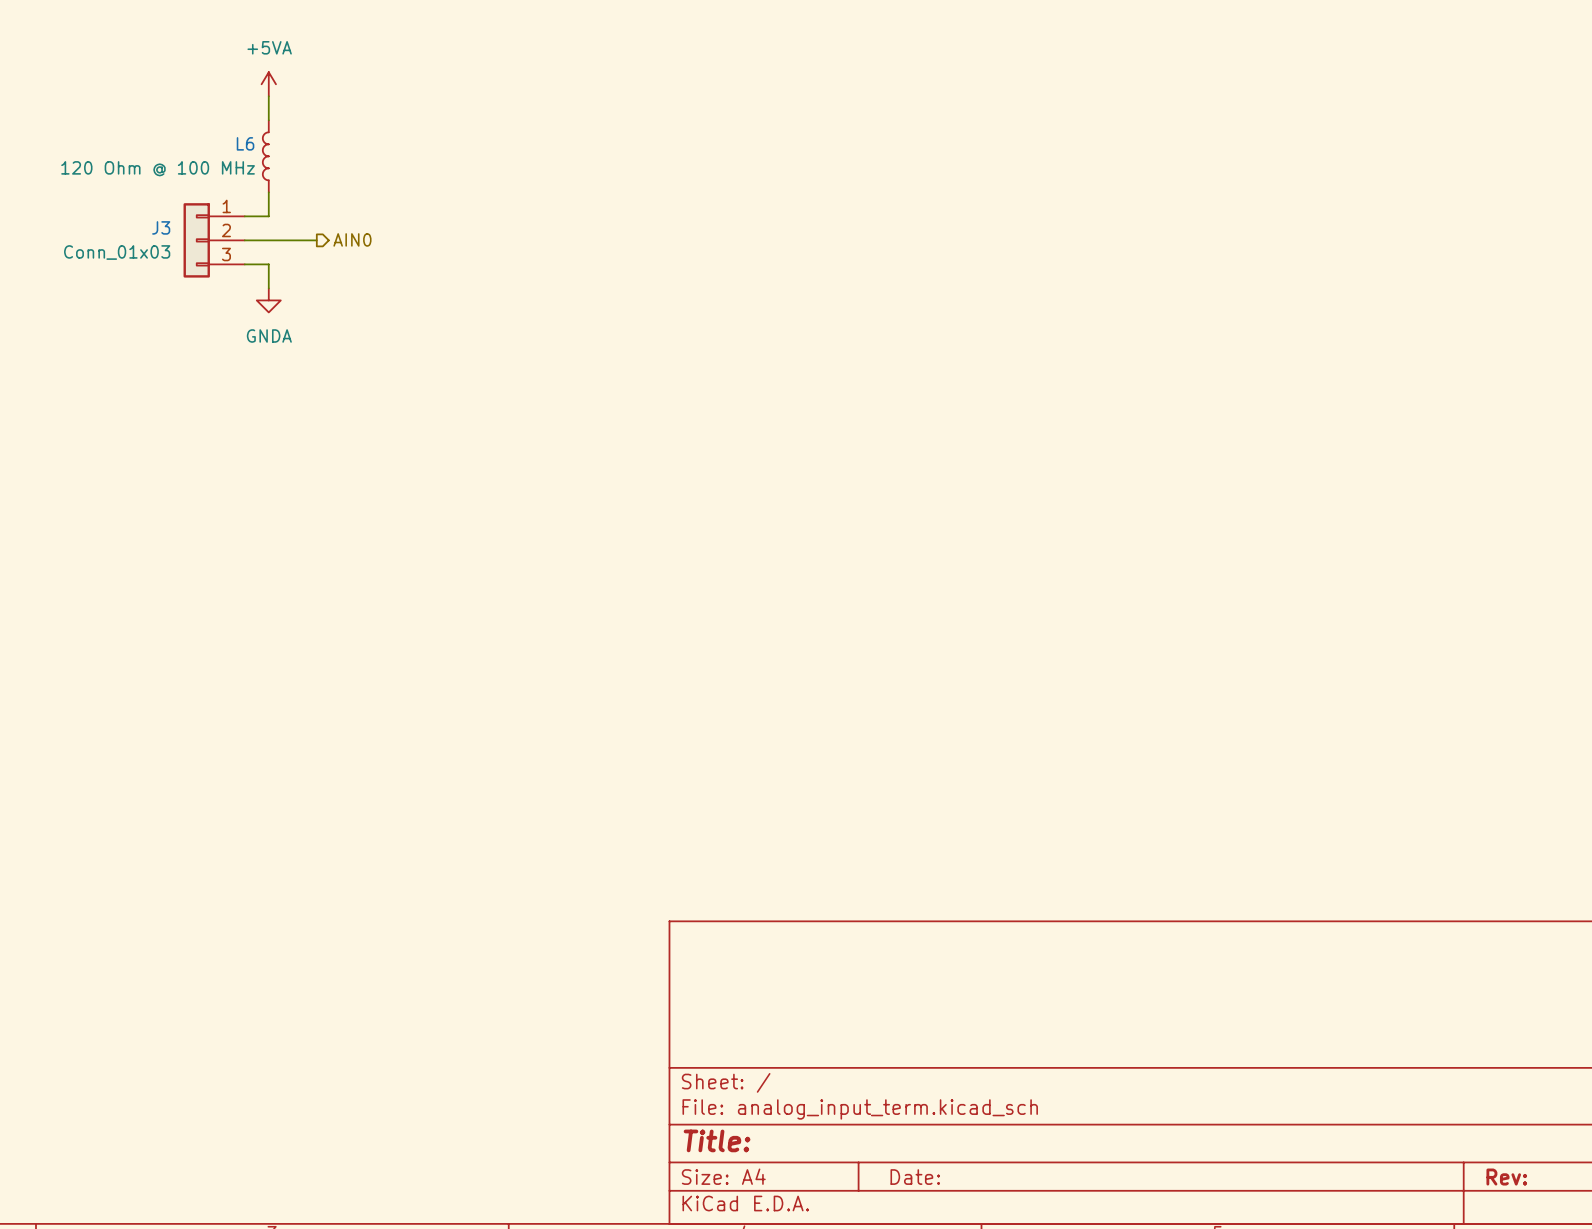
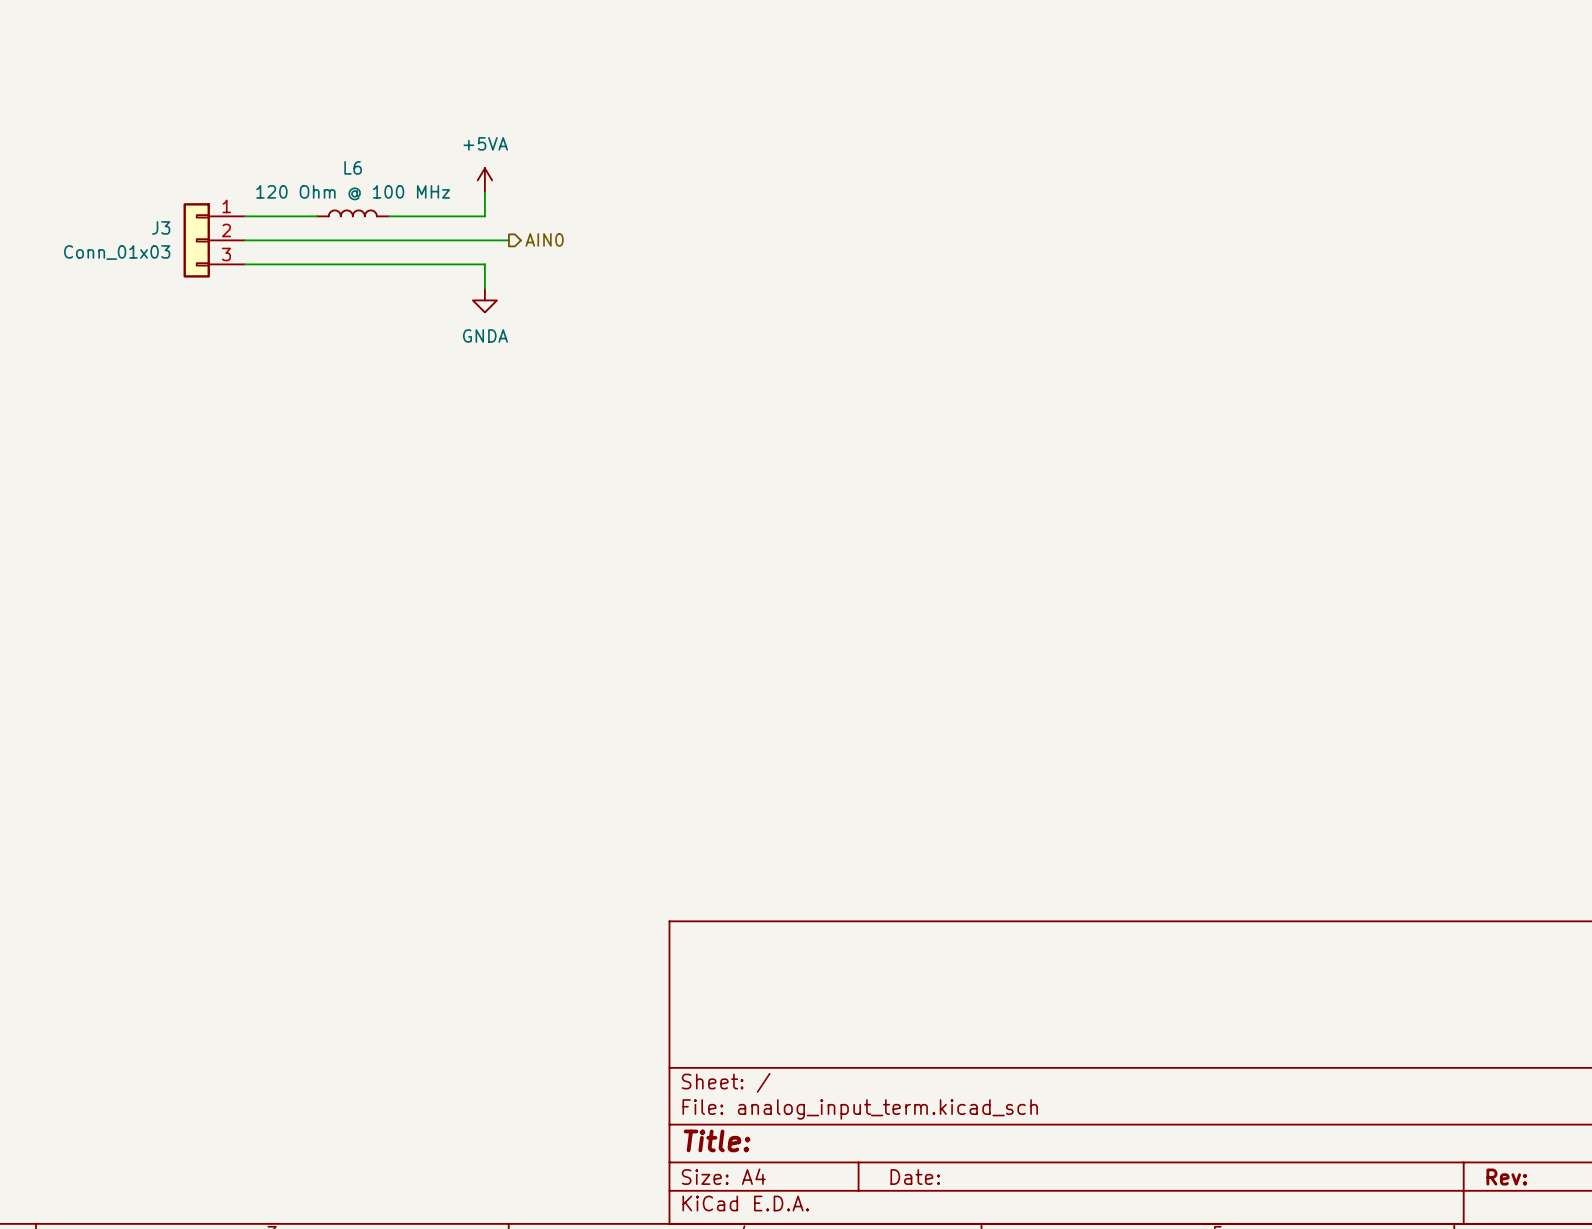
power symbol: +5VA (268, 84) -> none
wire: (268, 96) (268, 120) -> none
L6 name position: L6 (245, 143) -> L6 (353, 167)
L6 rotation: 0° (265, 156) -> 90° clockwise (352, 213)
L6 position: (265, 156) -> (352, 213)
L6 value position: 120 Ohm @ 100 MHz (158, 168) -> 120 Ohm @ 100 MHz (353, 192)
power symbol: none -> +5VA (484, 180)
wire: (268, 192) (268, 216) -> (316, 216) (268, 216)
wire: none -> (484, 192) (484, 216) (388, 216)
hierarchical label position: AIN0 (352, 239) -> AIN0 (544, 239)
wire: none -> (316, 240) (508, 240)
wire: (268, 264) (268, 288) -> (268, 264) (484, 264) (484, 288)
power symbol position: GNDA (268, 300) -> GNDA (484, 300)

